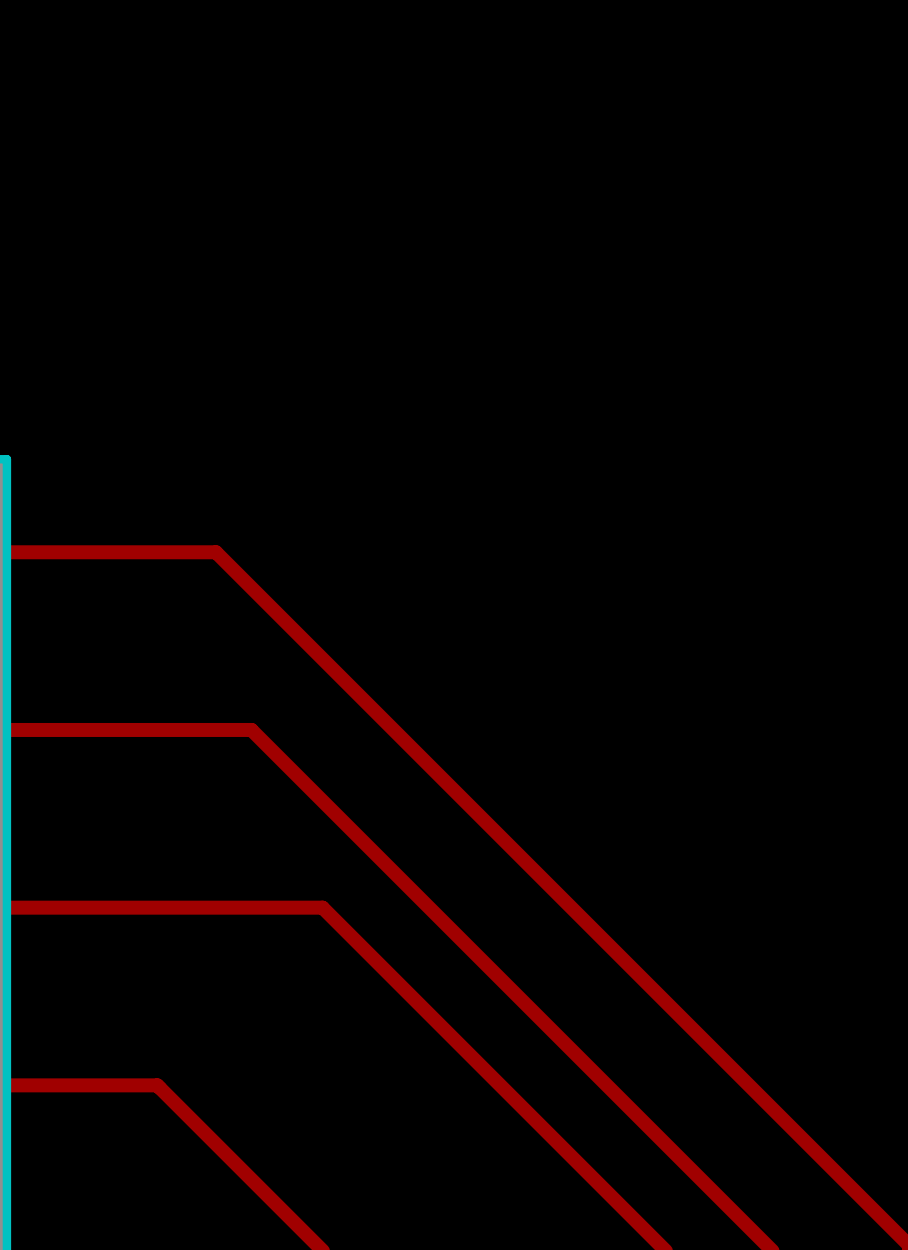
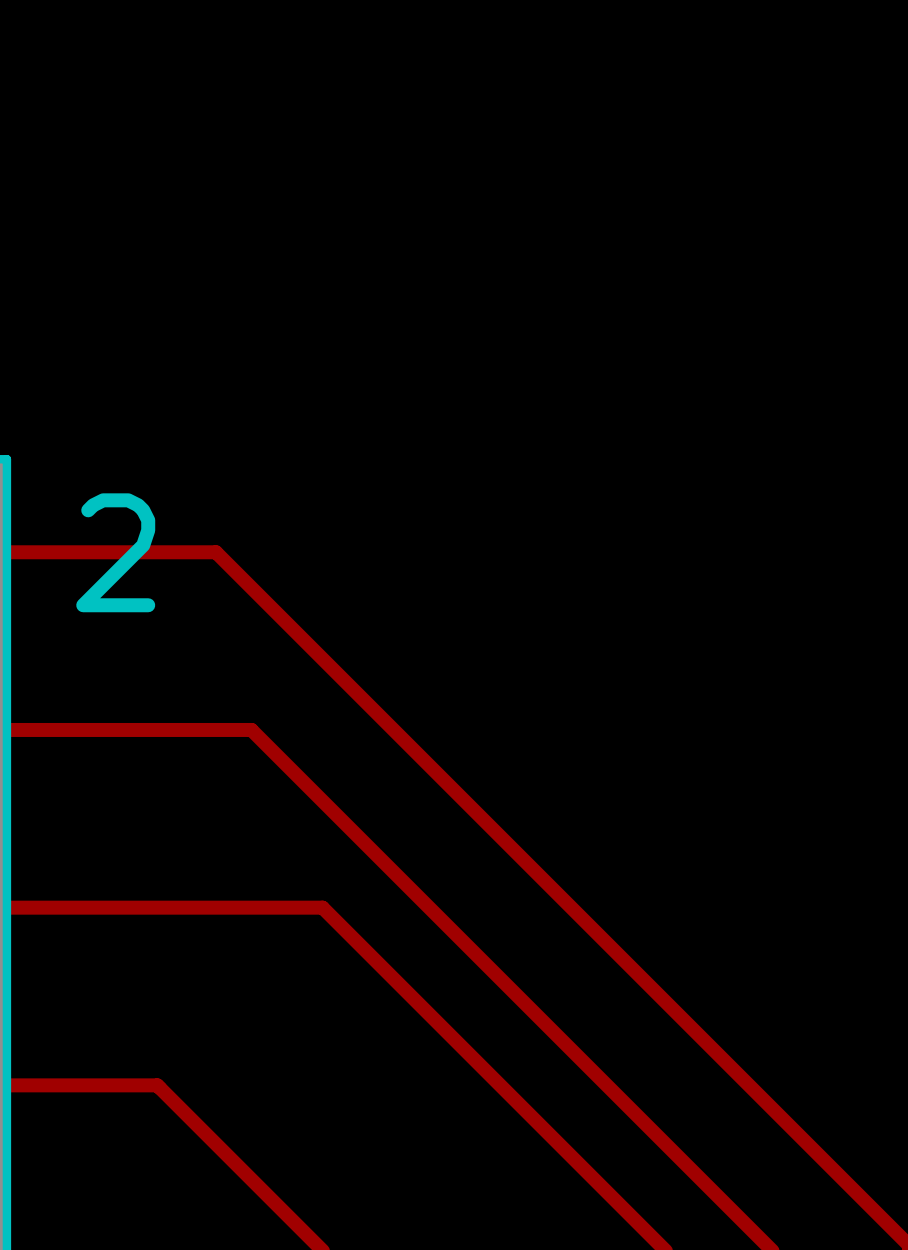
text: none -> 2 (115, 552)

